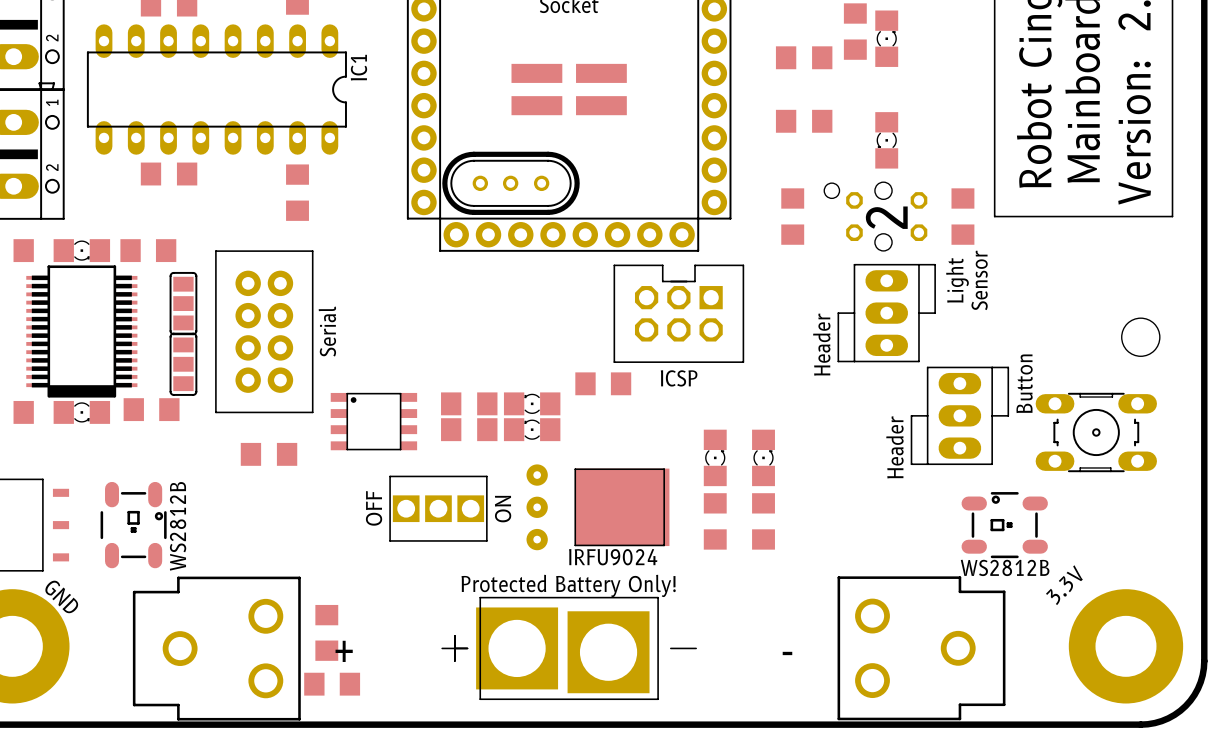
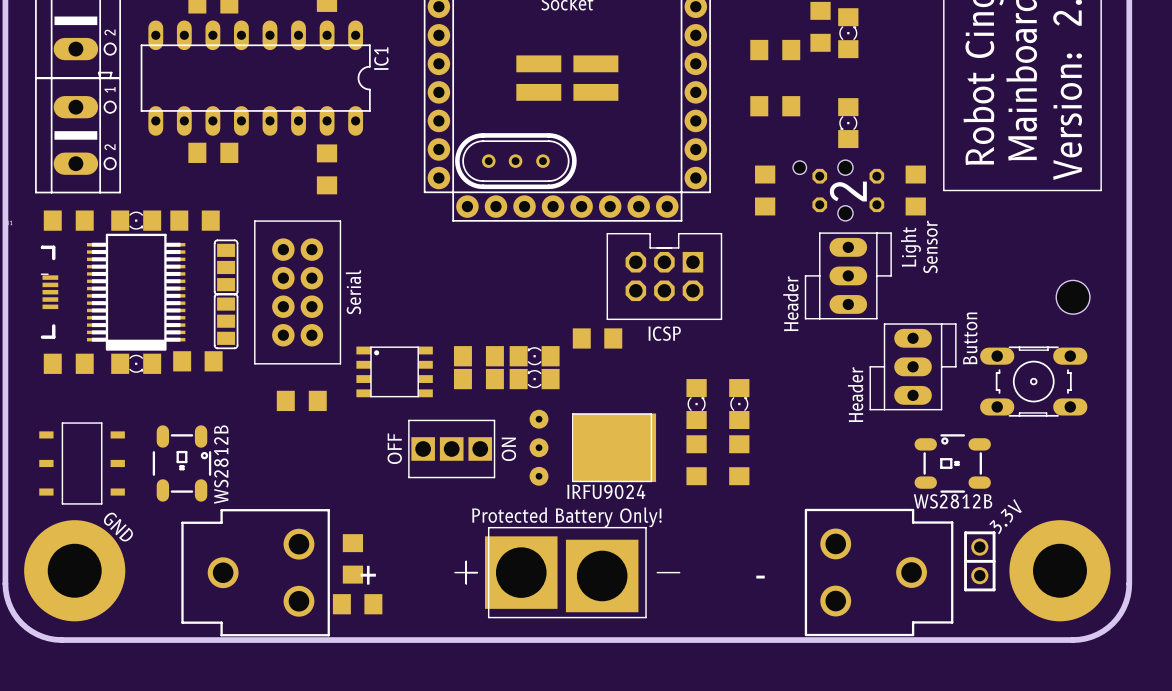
part: none -> (979, 561)

